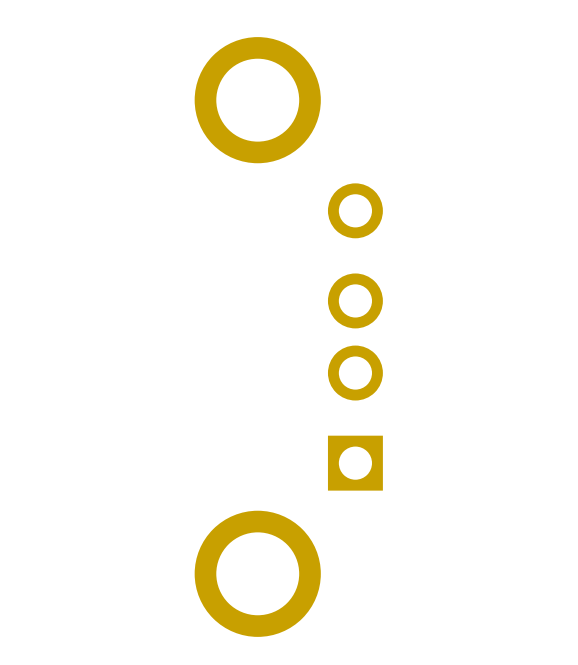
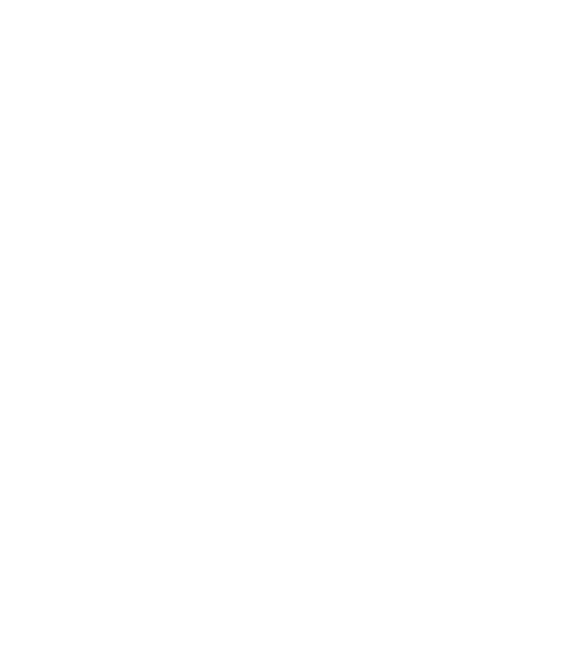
part: (288, 336) -> none

